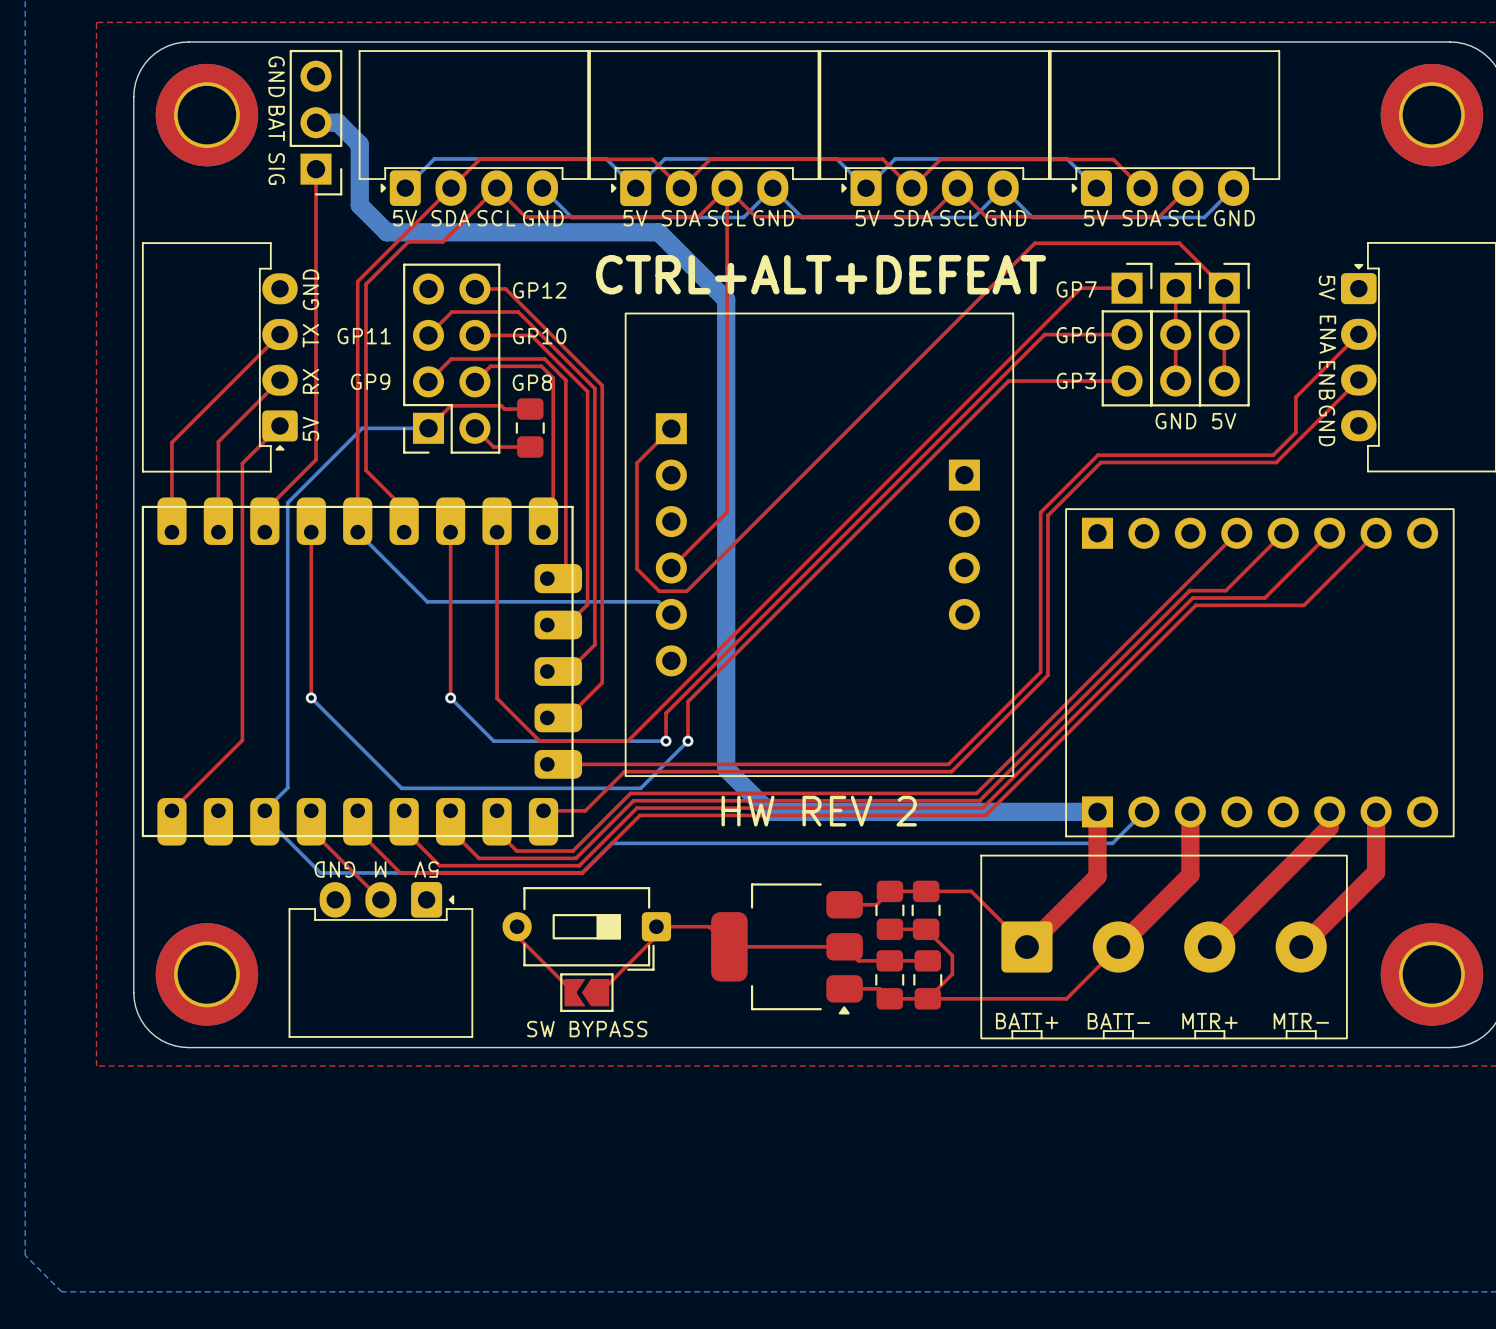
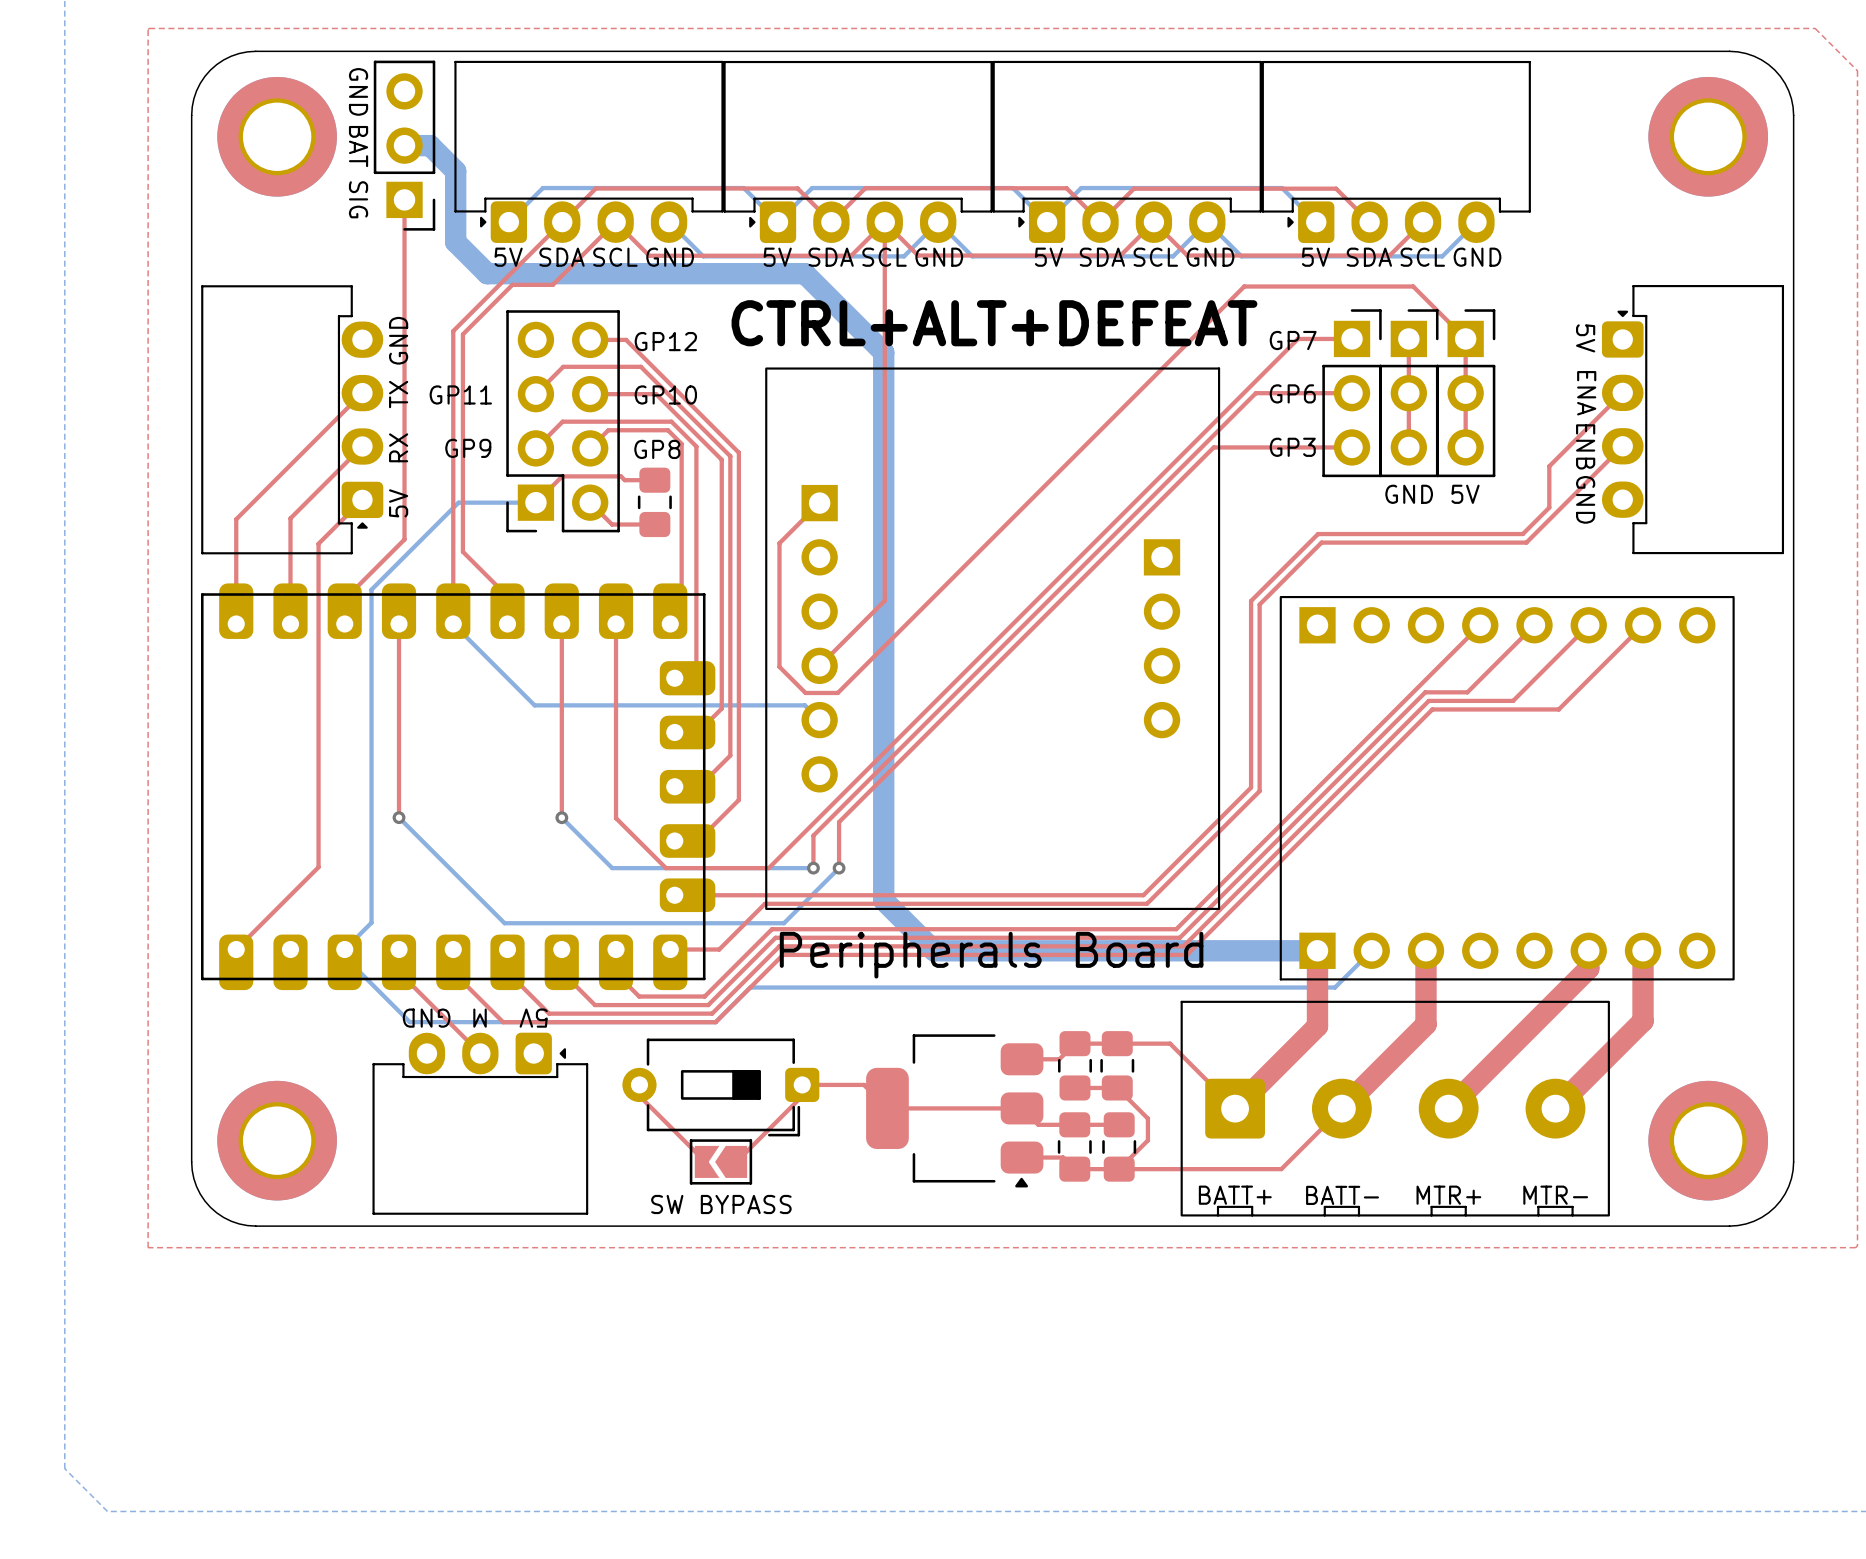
text: HW REV 2 (819, 811) -> Peripherals Board (991, 955)

